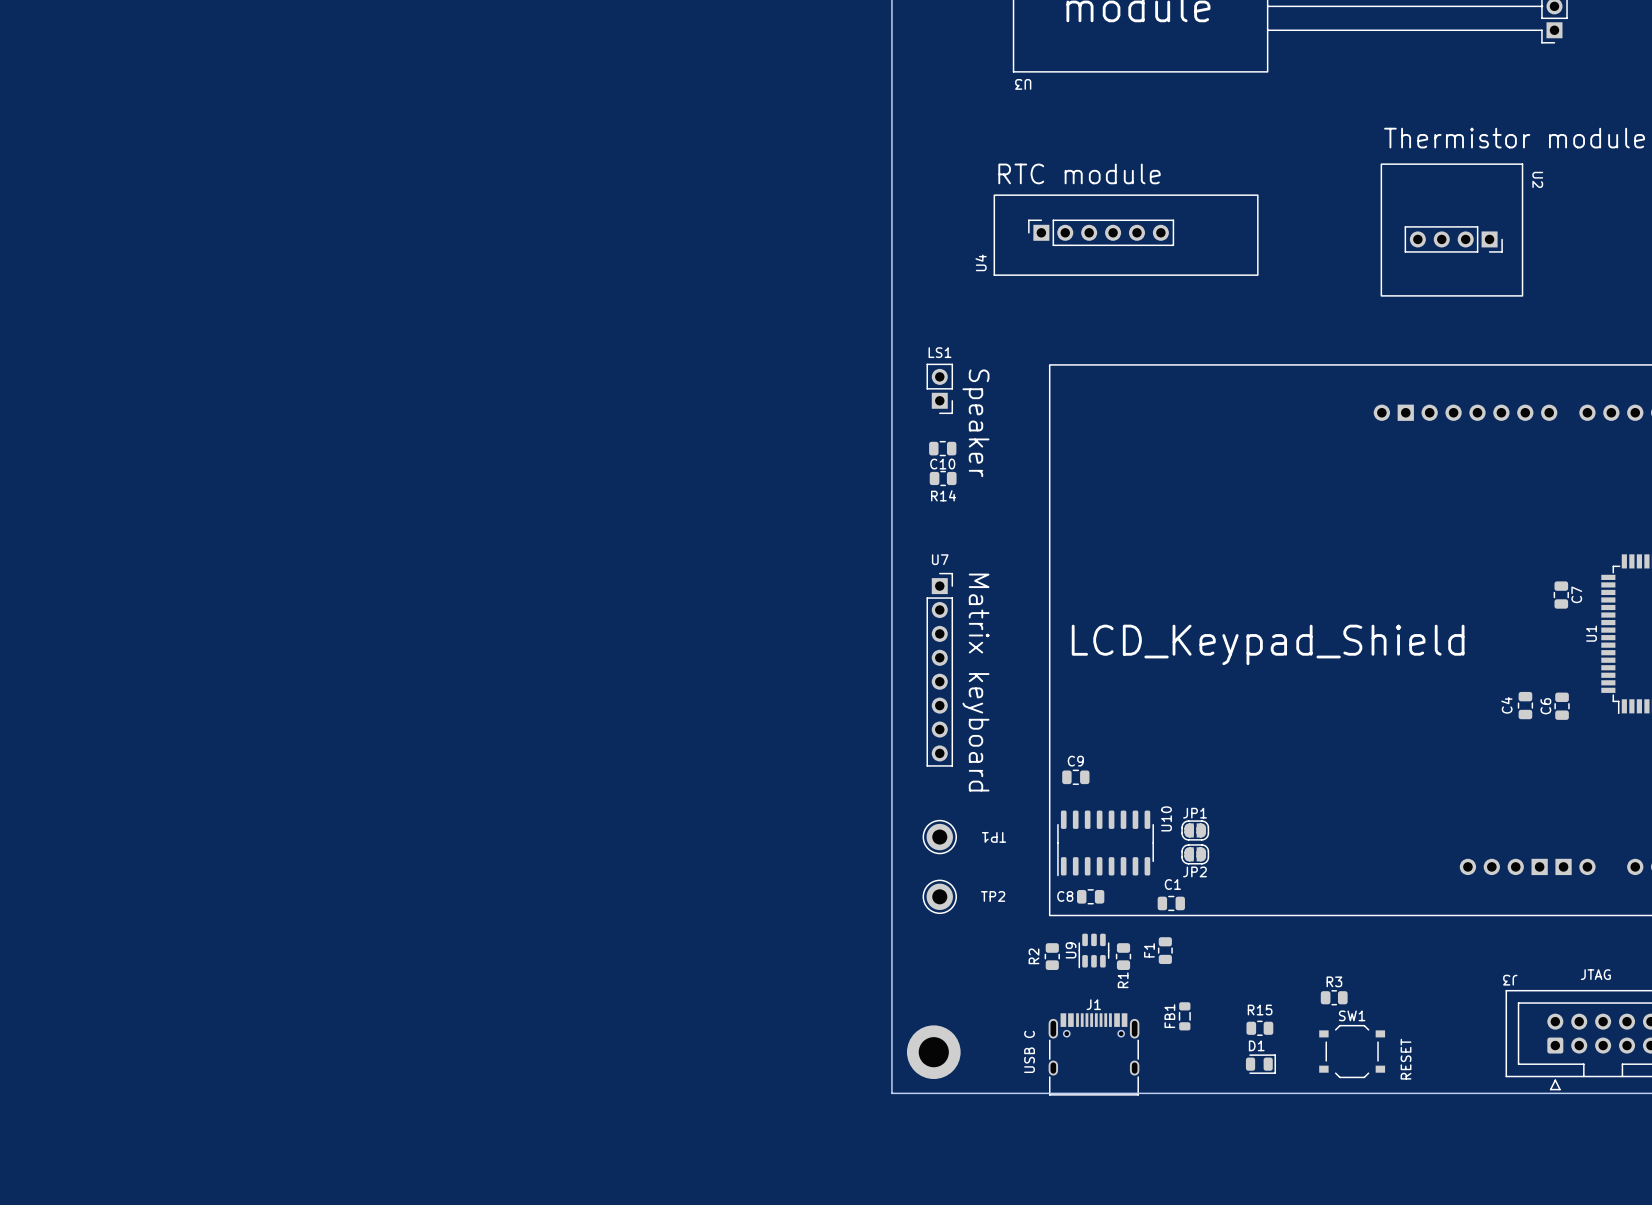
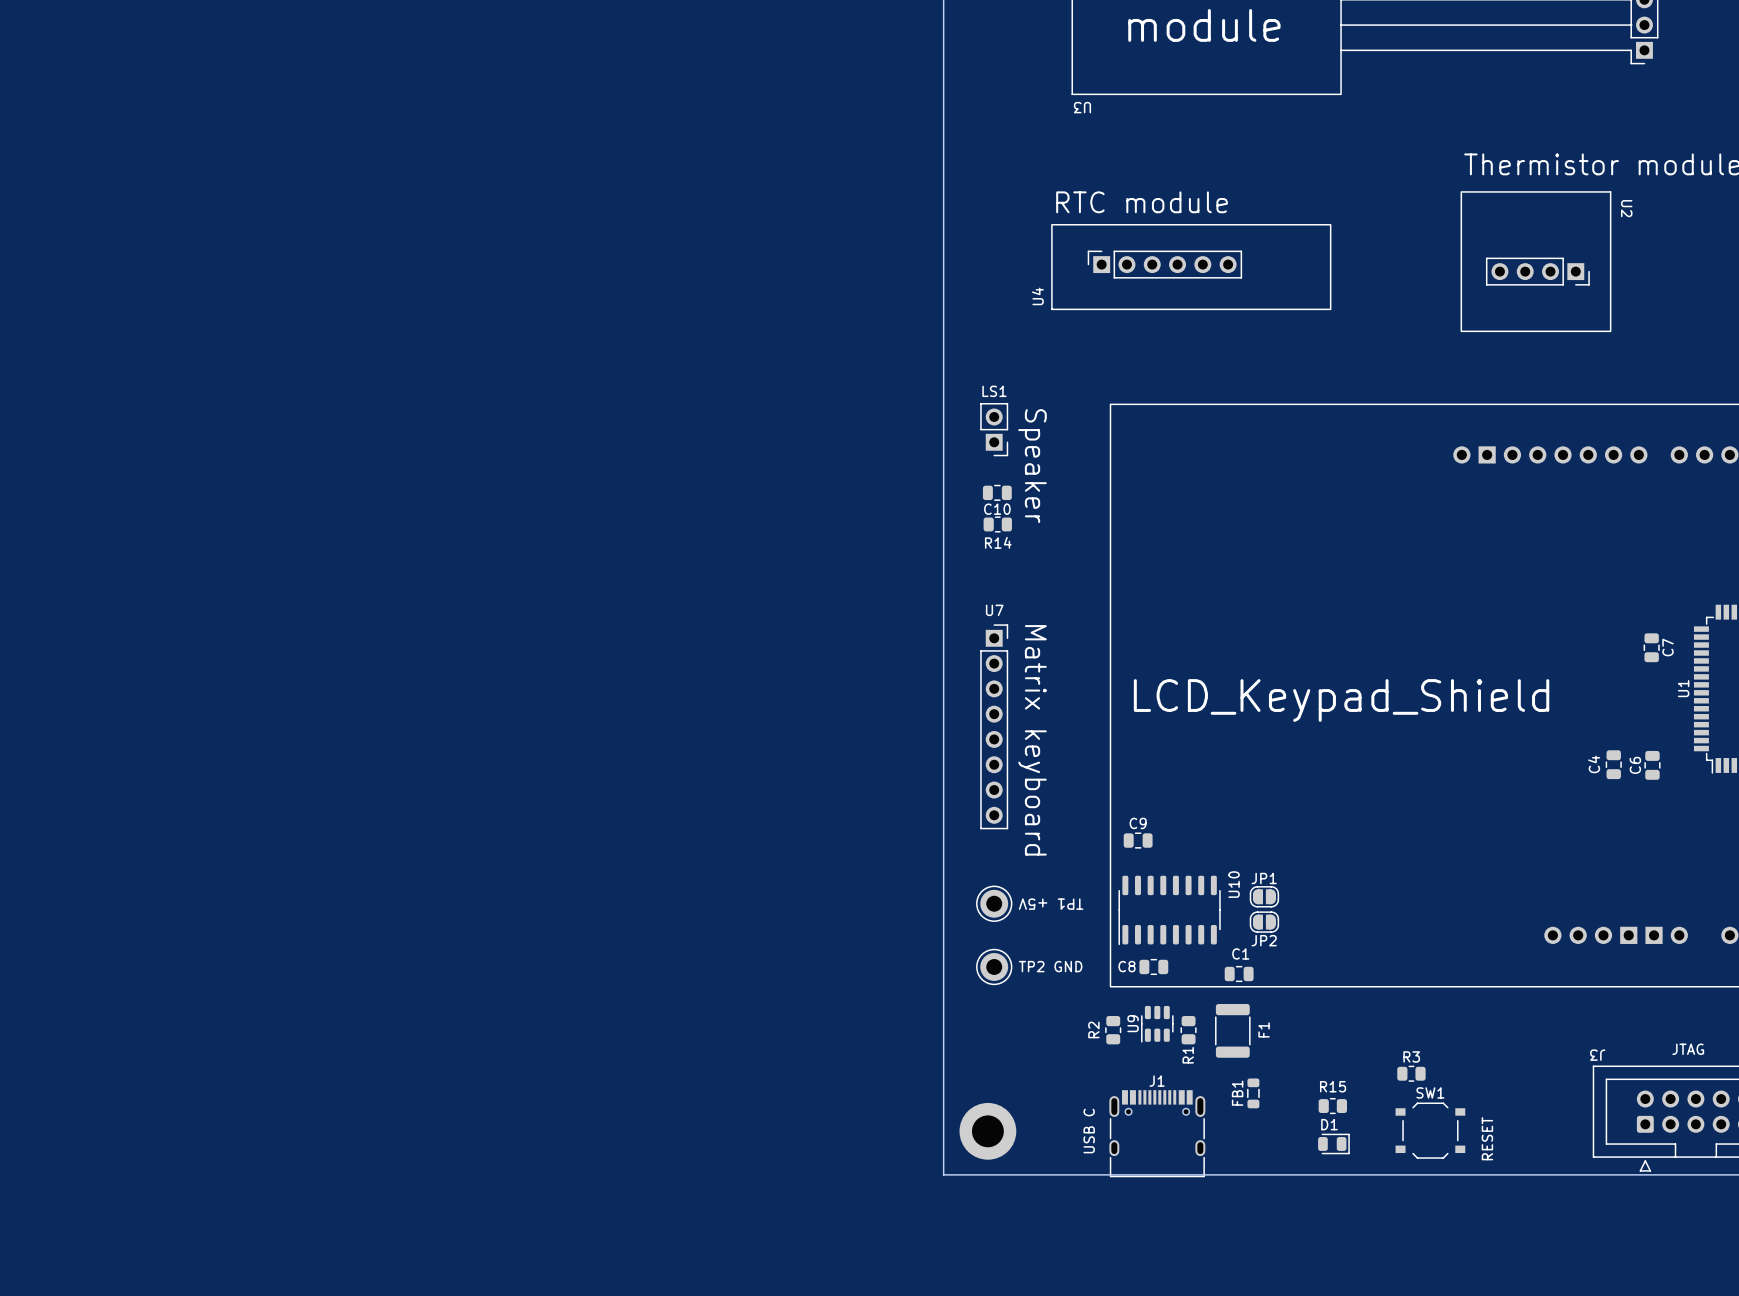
TP1 name: TP1 (994, 837) -> TP1 +5V (1051, 904)
TP2 name: TP2 (993, 896) -> TP2 GND (1050, 966)
F1 footprint: [1158, 937, 1173, 965] -> [1215, 1004, 1251, 1058]
F1 name position: F1 (1149, 950) -> F1 (1264, 1029)

